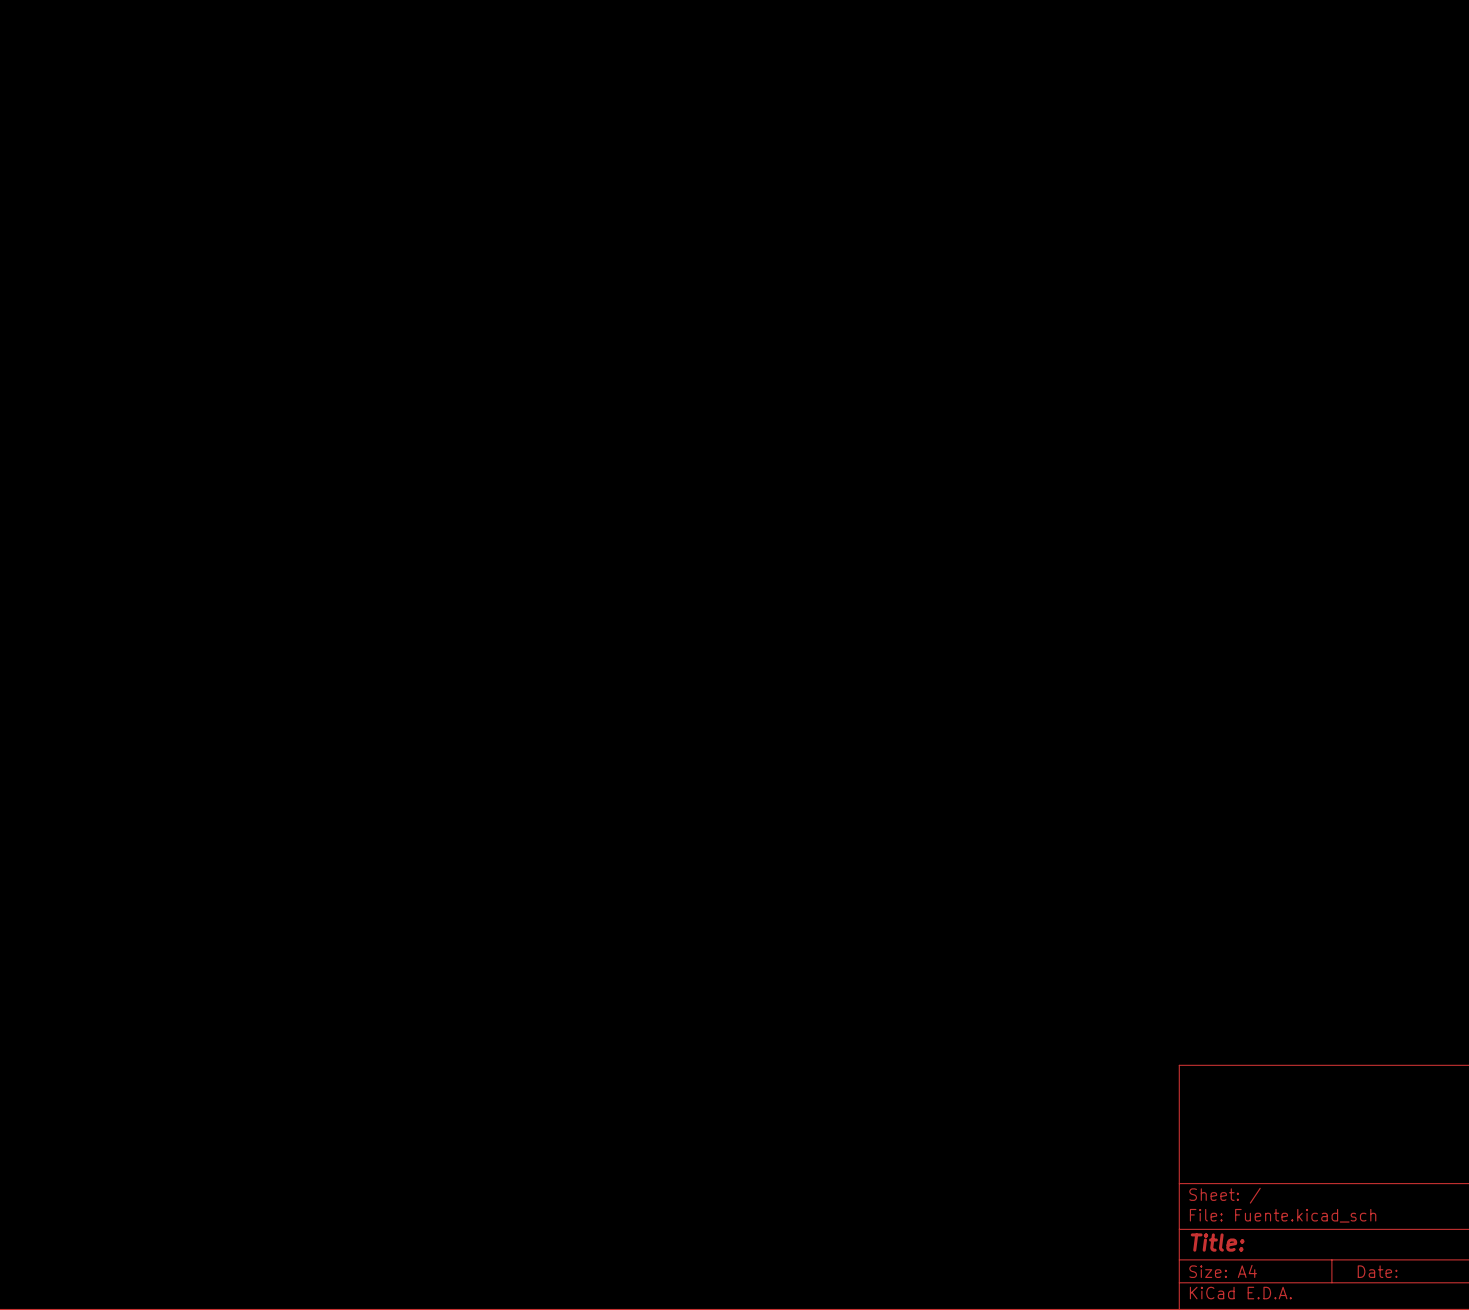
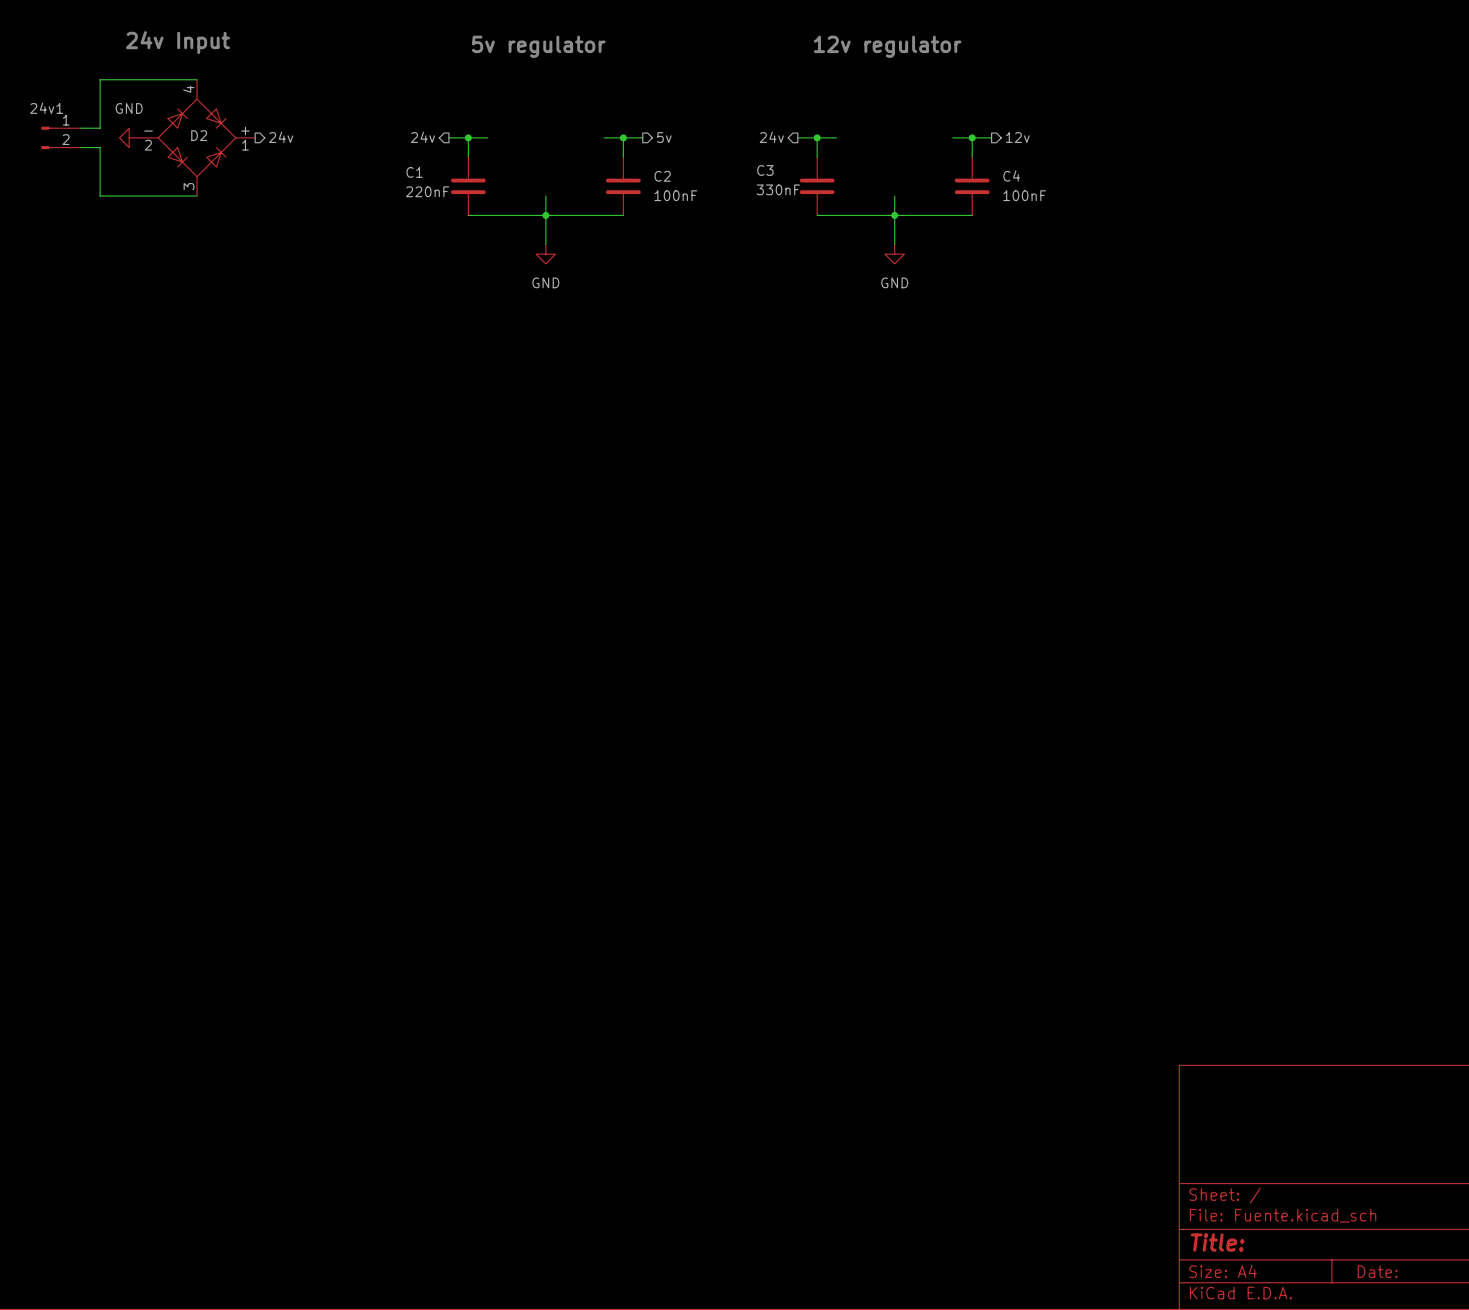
text: none -> 24v Input (177, 42)
text: none -> 5v regulator (538, 46)
text: none -> 12v regulator (887, 46)
wire: none -> (197, 79) (100, 79) (100, 128) (80, 128)
24v1: none -> (61, 137)
power symbol: none -> GND (129, 137)
D2: none -> (197, 137)
hierarchical label: none -> 24v (281, 137)
hierarchical label: none -> 24v (422, 137)
wire: none -> (448, 137) (487, 137)
wire: none -> (468, 137) (468, 157)
junction: none -> (468, 137)
wire: none -> (604, 137) (642, 137)
wire: none -> (623, 137) (623, 157)
junction: none -> (623, 137)
hierarchical label: none -> 5v (664, 137)
hierarchical label: none -> 24v (771, 137)
wire: none -> (797, 137) (836, 137)
wire: none -> (817, 137) (817, 157)
junction: none -> (817, 137)
wire: none -> (952, 137) (991, 137)
wire: none -> (972, 137) (972, 157)
junction: none -> (972, 137)
hierarchical label: none -> 12v (1017, 137)
wire: none -> (80, 147) (100, 147) (100, 196) (197, 196)
C1: none -> 220nF (468, 186)
C2: none -> 100nF (623, 186)
C3: none -> 330nF (817, 186)
C4: none -> 100nF (972, 186)
wire: none -> (545, 196) (545, 244)
wire: none -> (894, 196) (894, 244)
wire: none -> (468, 215) (623, 215)
junction: none -> (545, 215)
wire: none -> (817, 215) (972, 215)
junction: none -> (894, 215)
power symbol: none -> GND (545, 254)
power symbol: none -> GND (894, 254)

